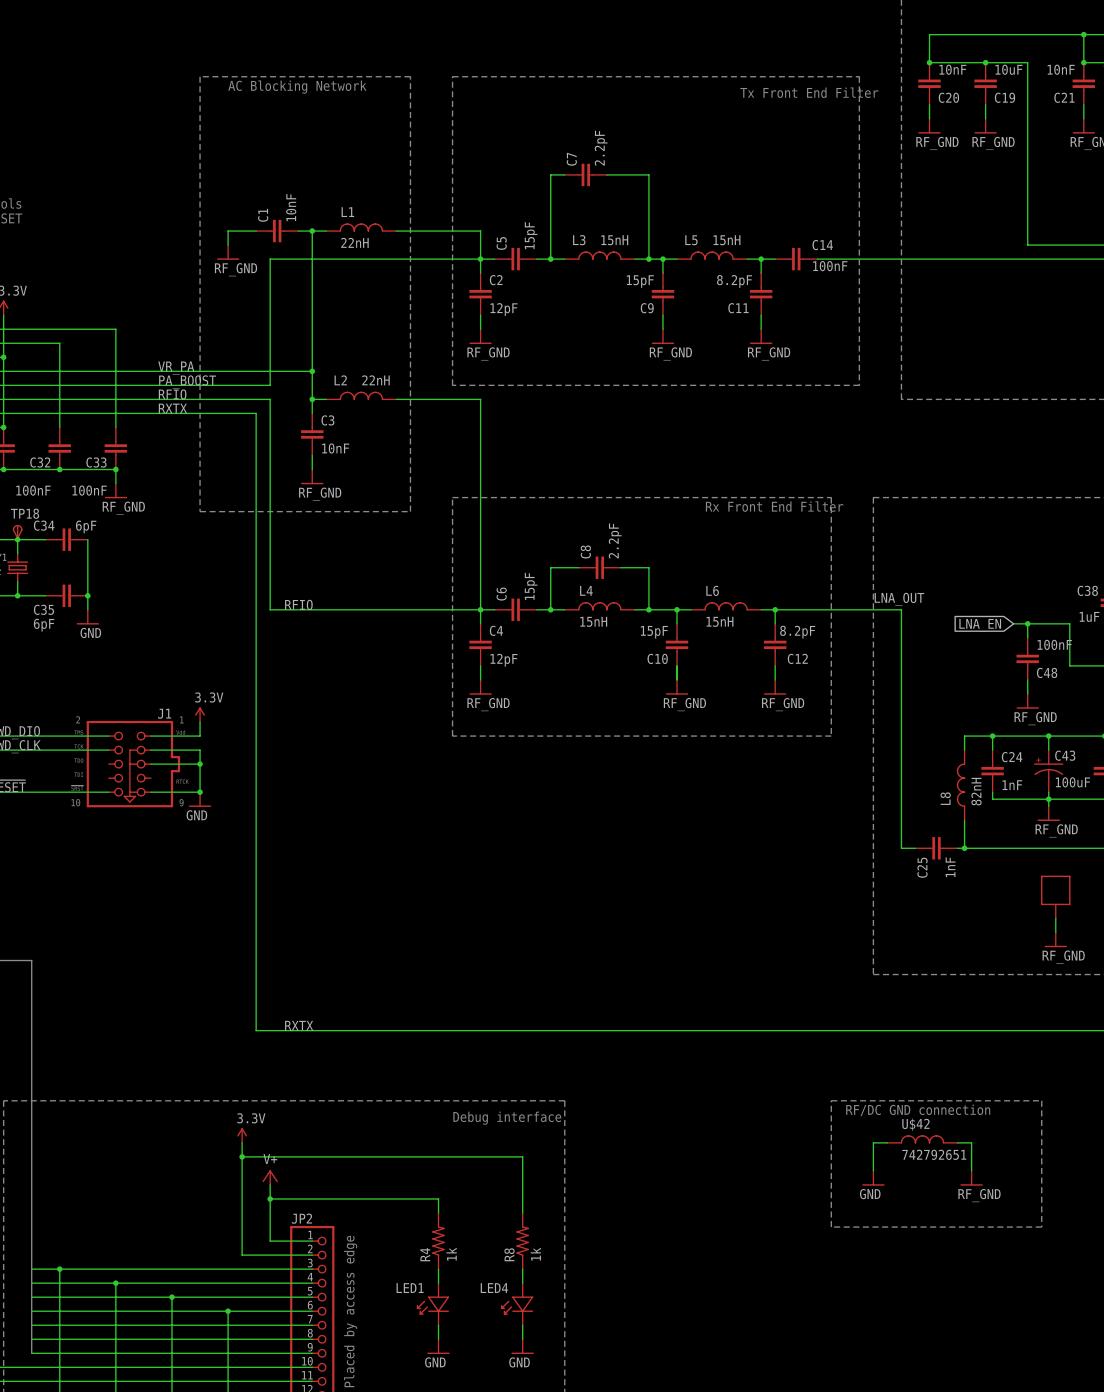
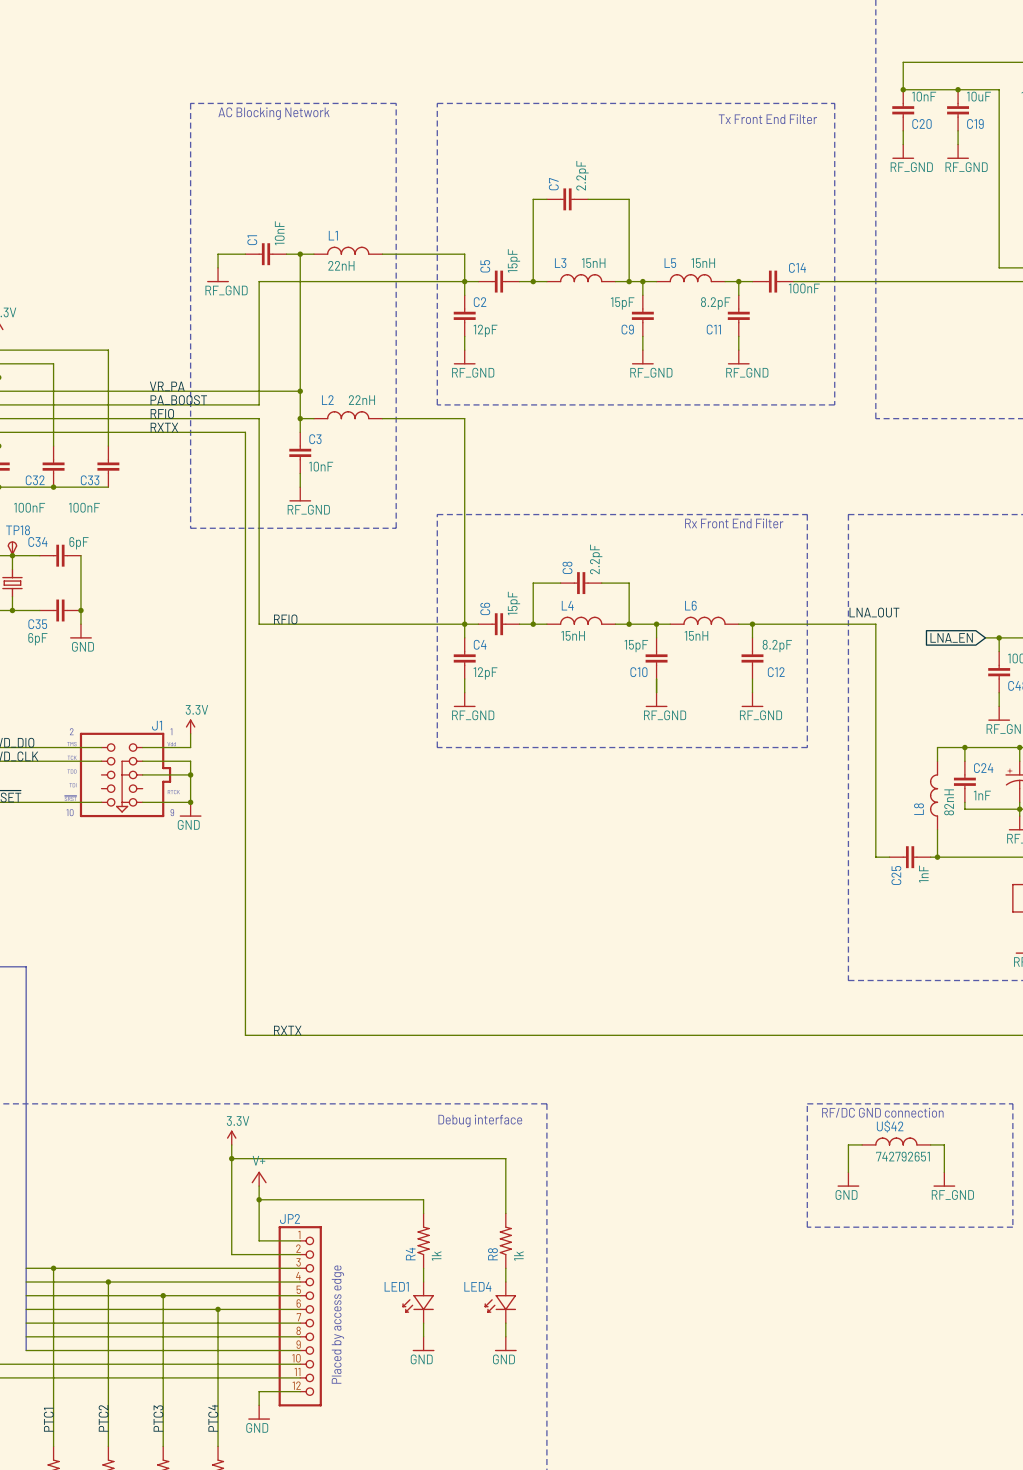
wire: (115, 469) (115, 483) -> none
junction: (115, 469) -> none
power symbol: RF_GND (115, 490) -> none

